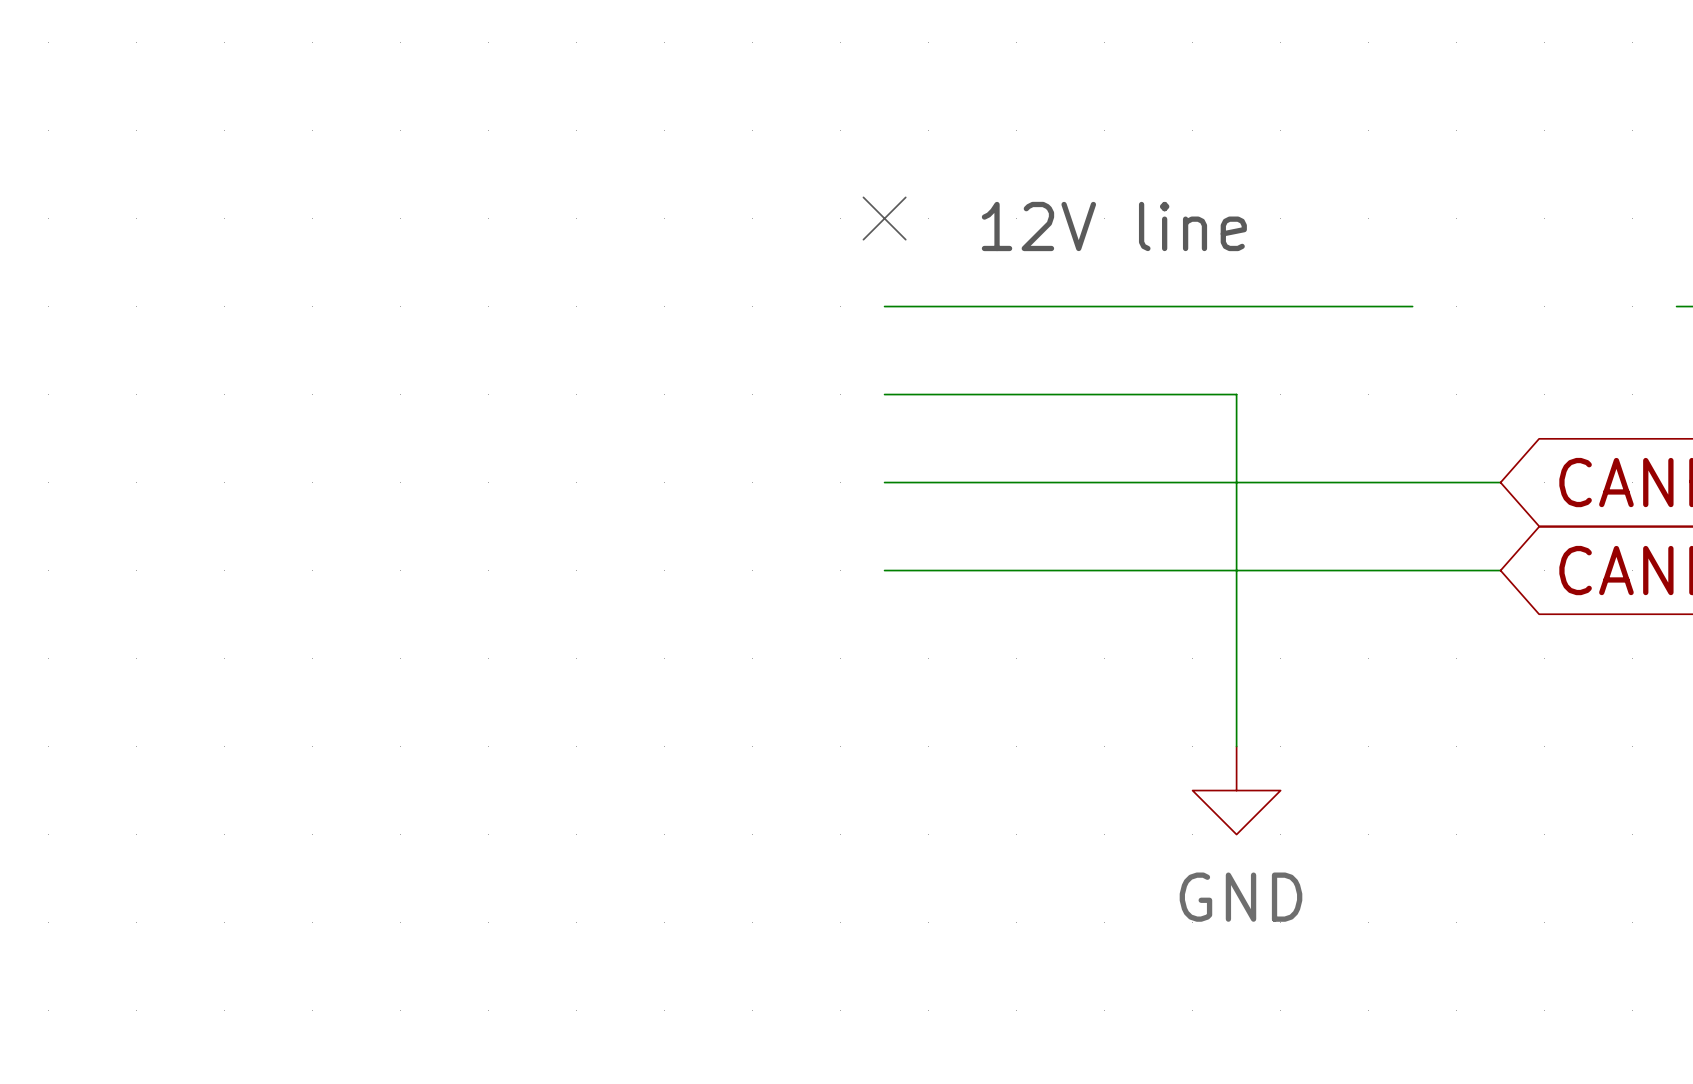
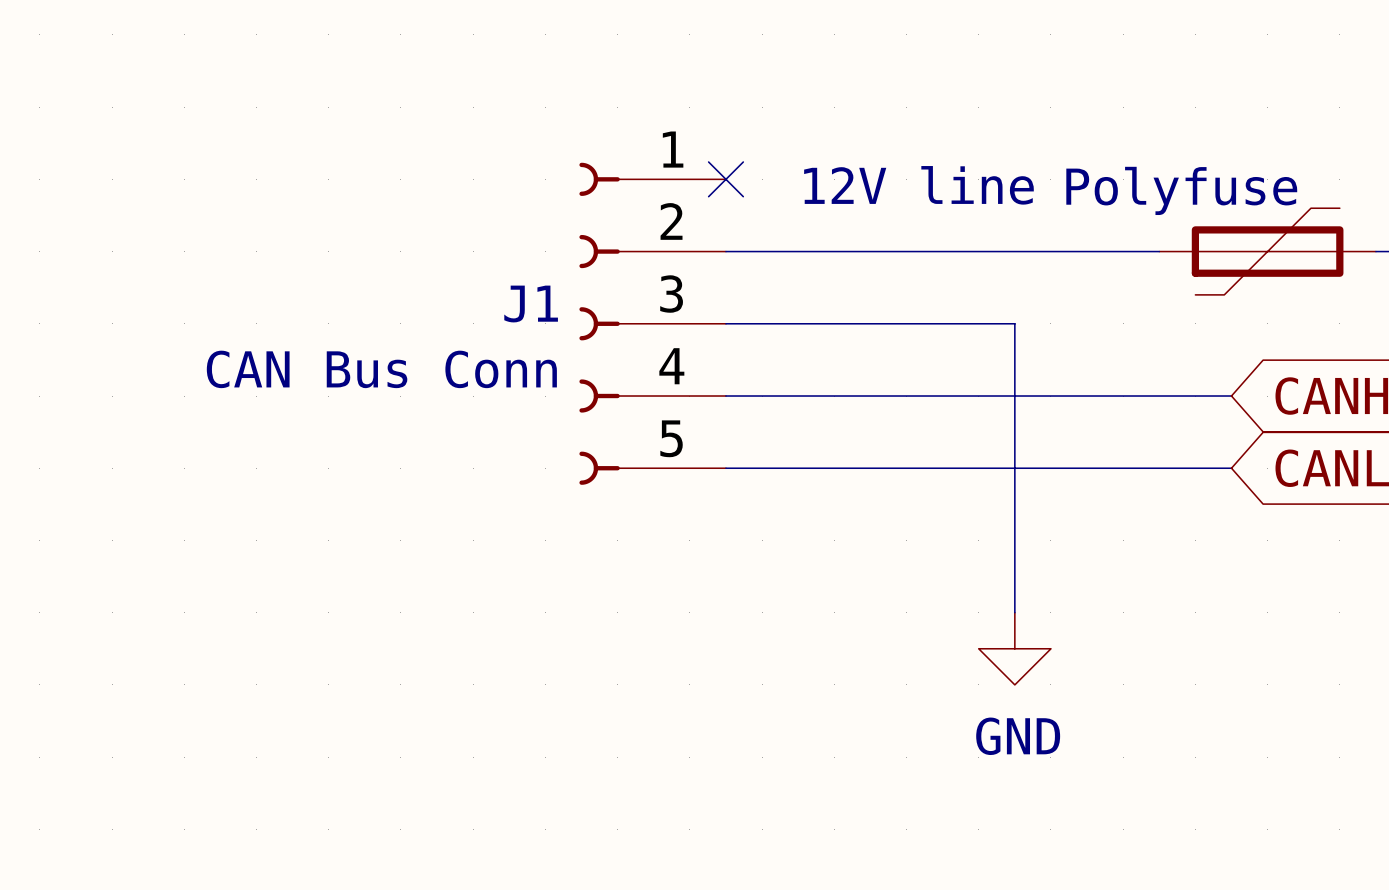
part: none -> Polyfuse (1267, 251)
J1: none -> CAN Bus Conn (652, 323)

